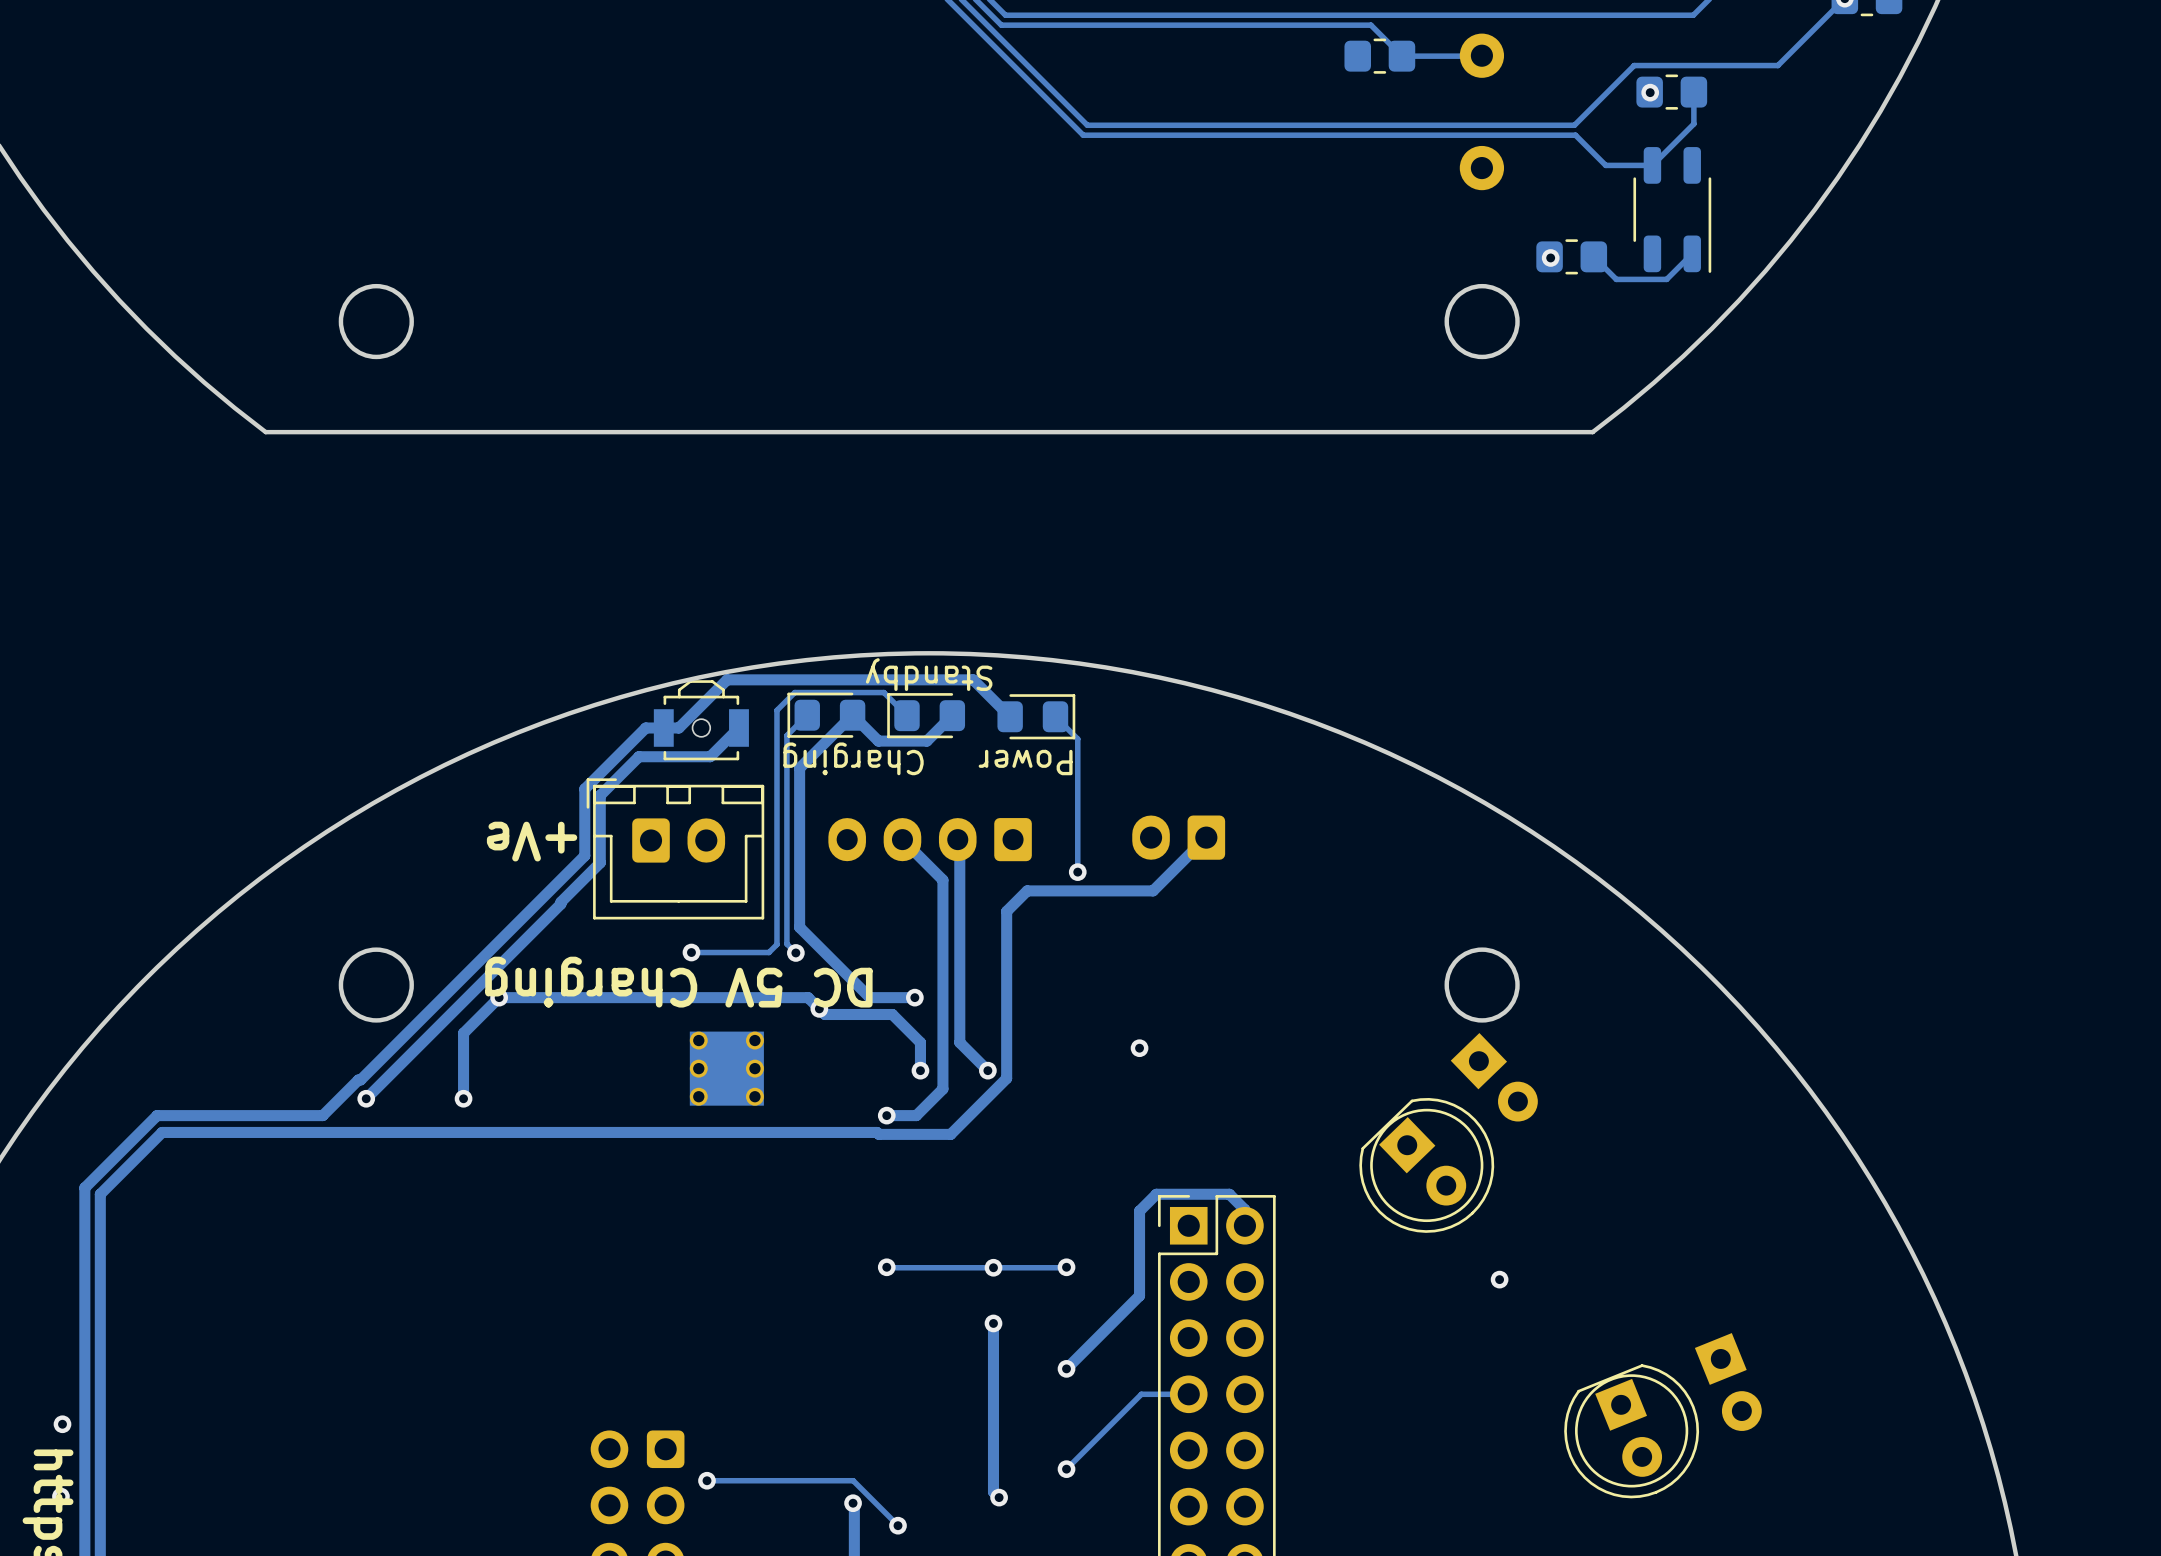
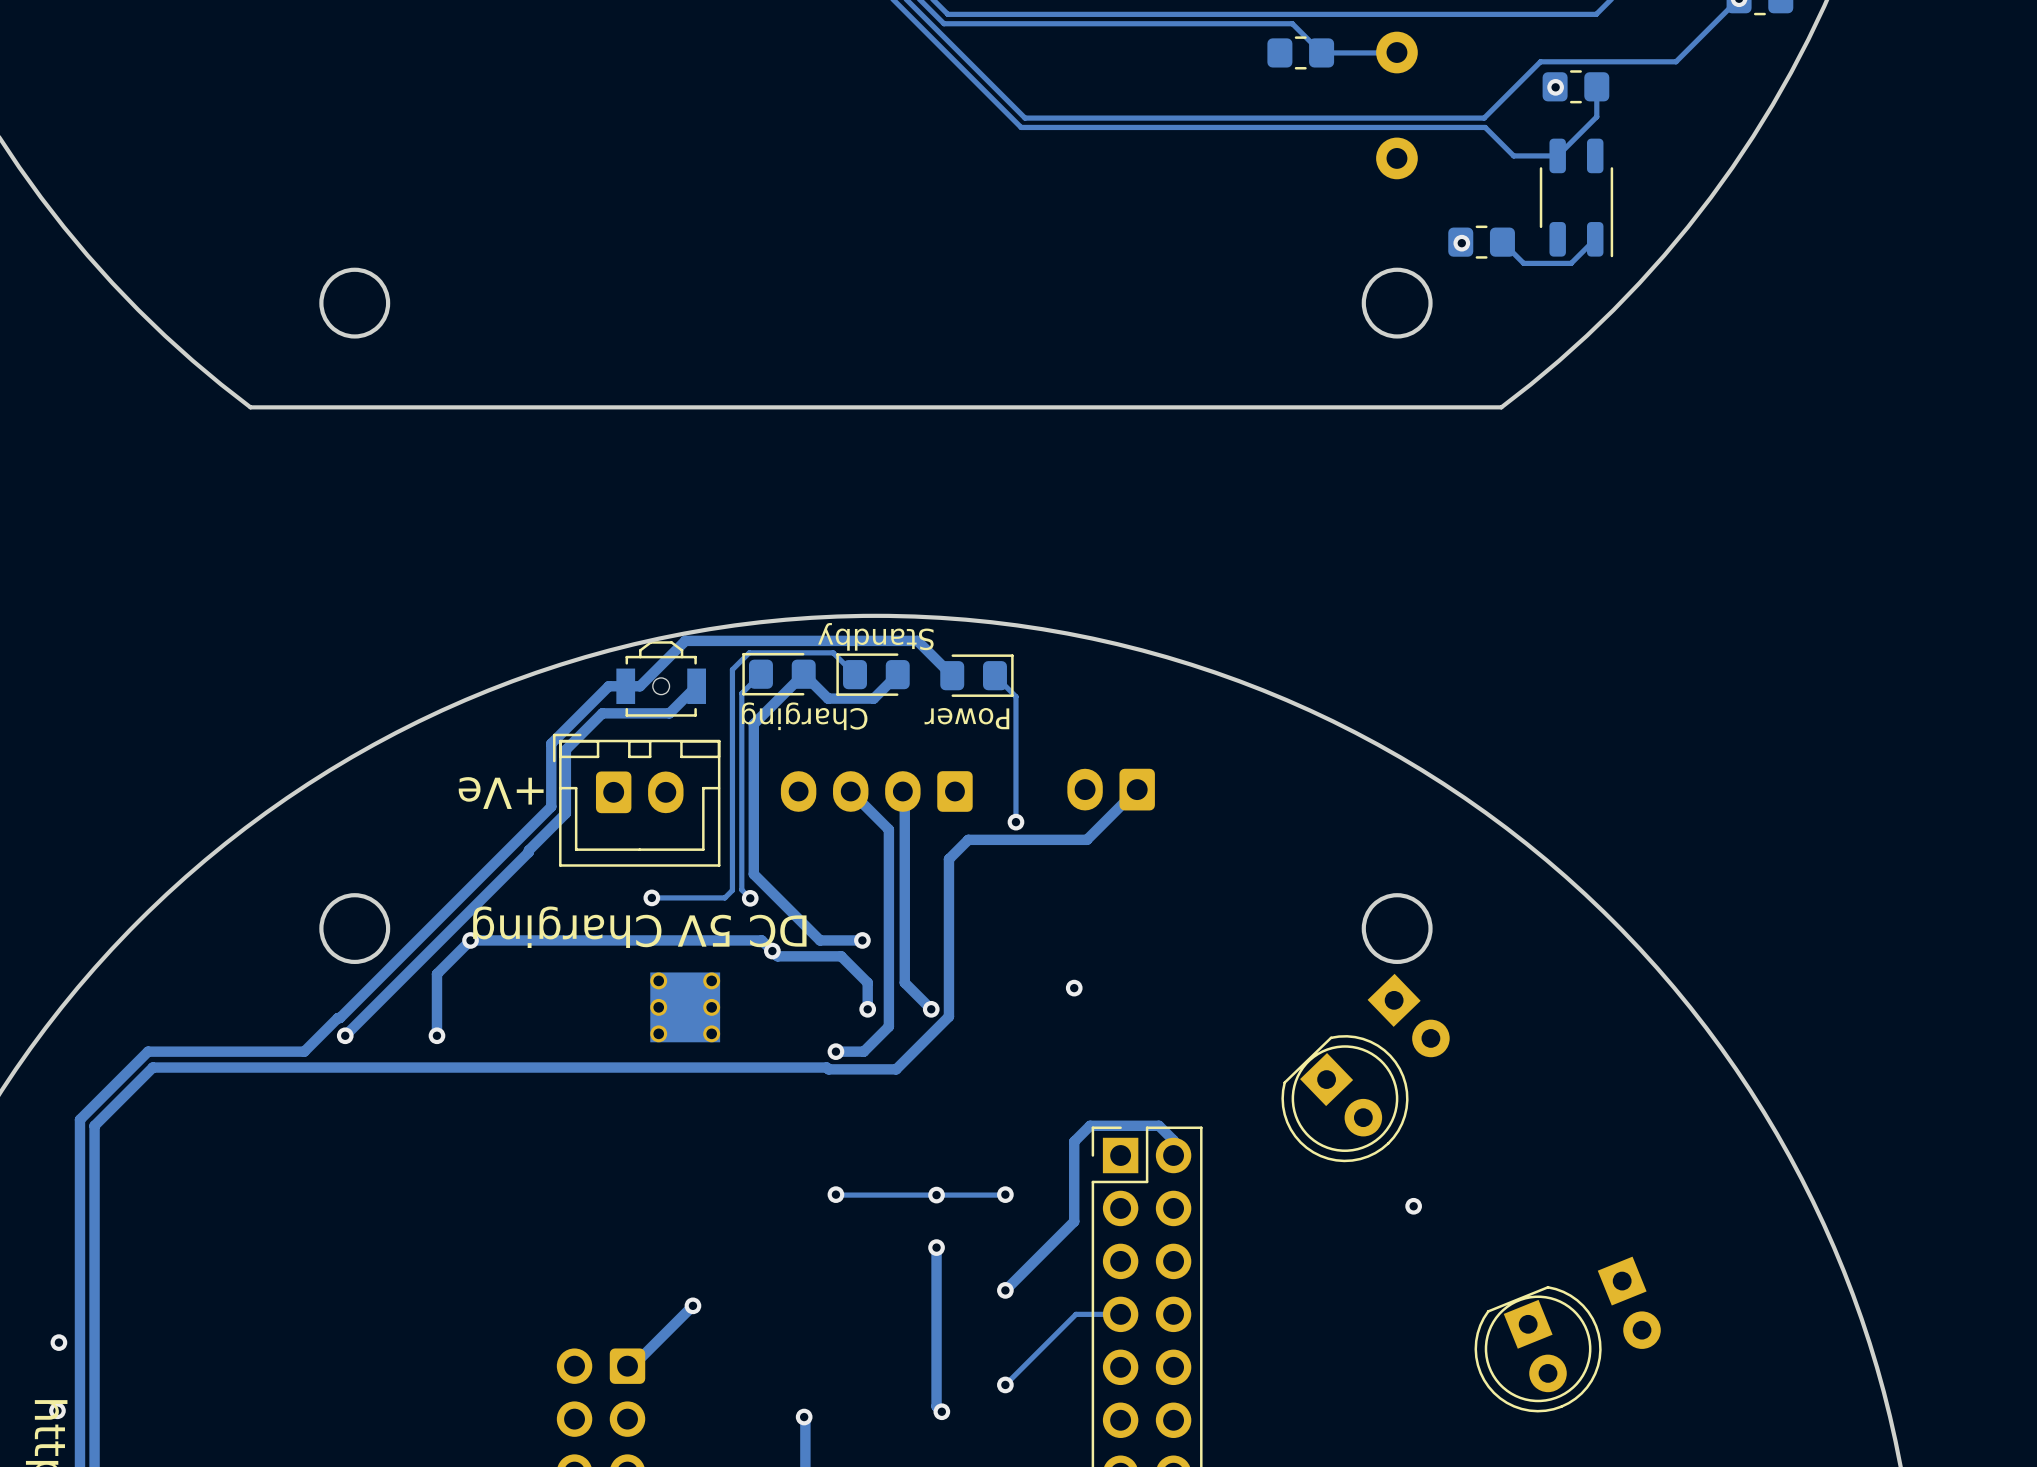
track: none -> (692, 1305) (632, 1366)
track: (707, 1480) (853, 1480) (898, 1525) -> none
via position: (707, 1480) -> (692, 1305)
via: (898, 1525) -> none

